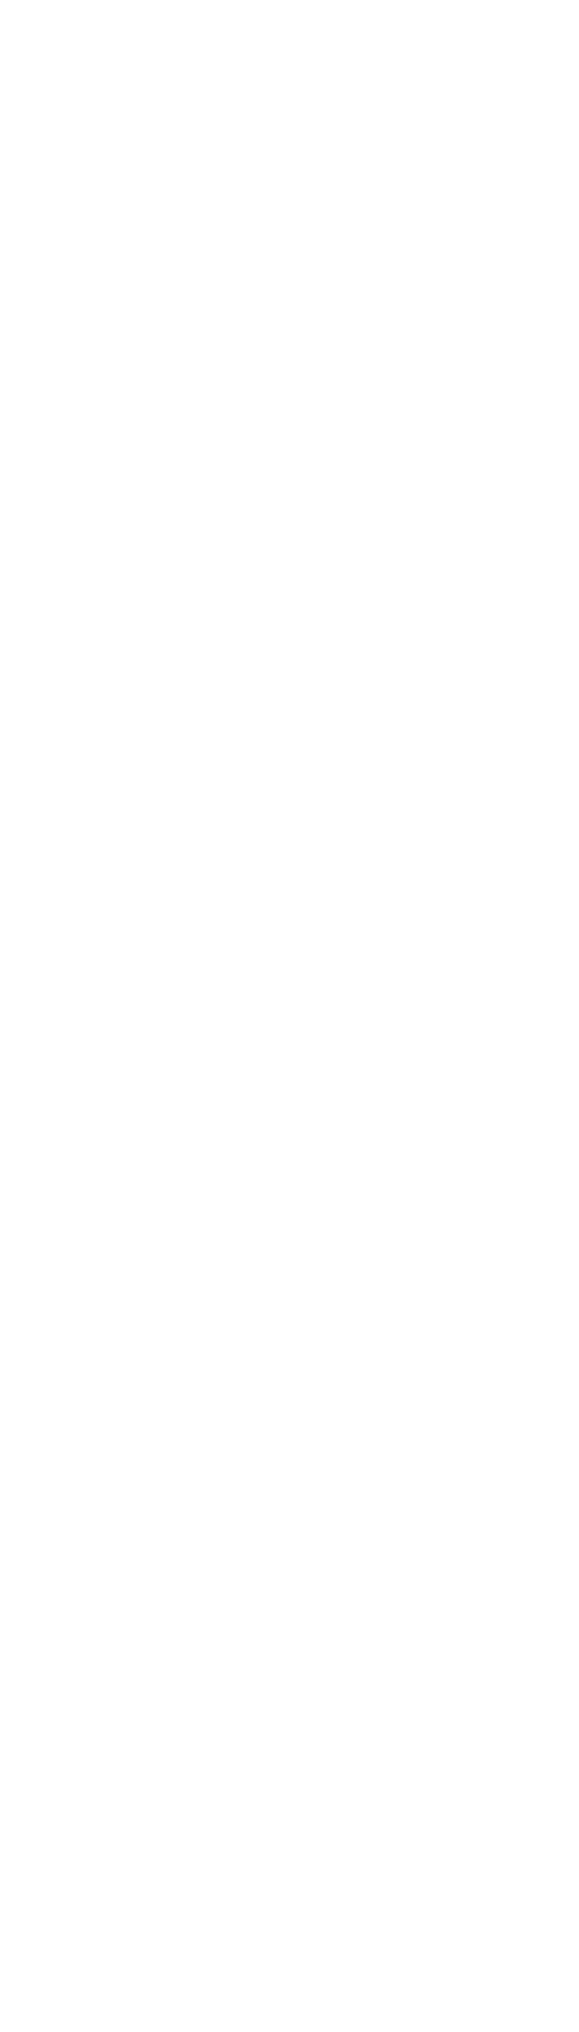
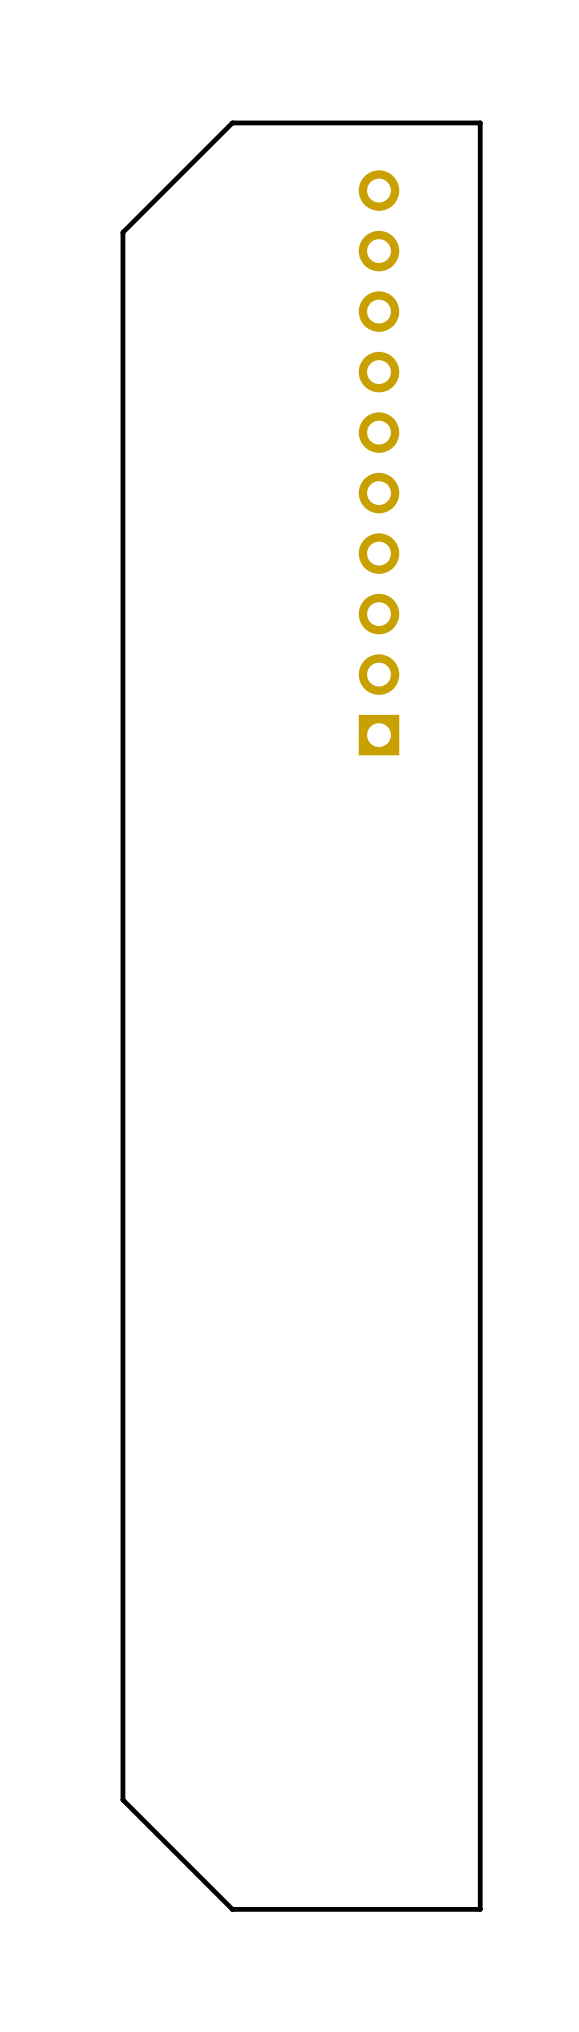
board edge: none -> (480, 122) (480, 1909) (232, 1909) (122, 1799) (122, 232) (232, 122) (480, 122)
part: none -> (379, 462)

